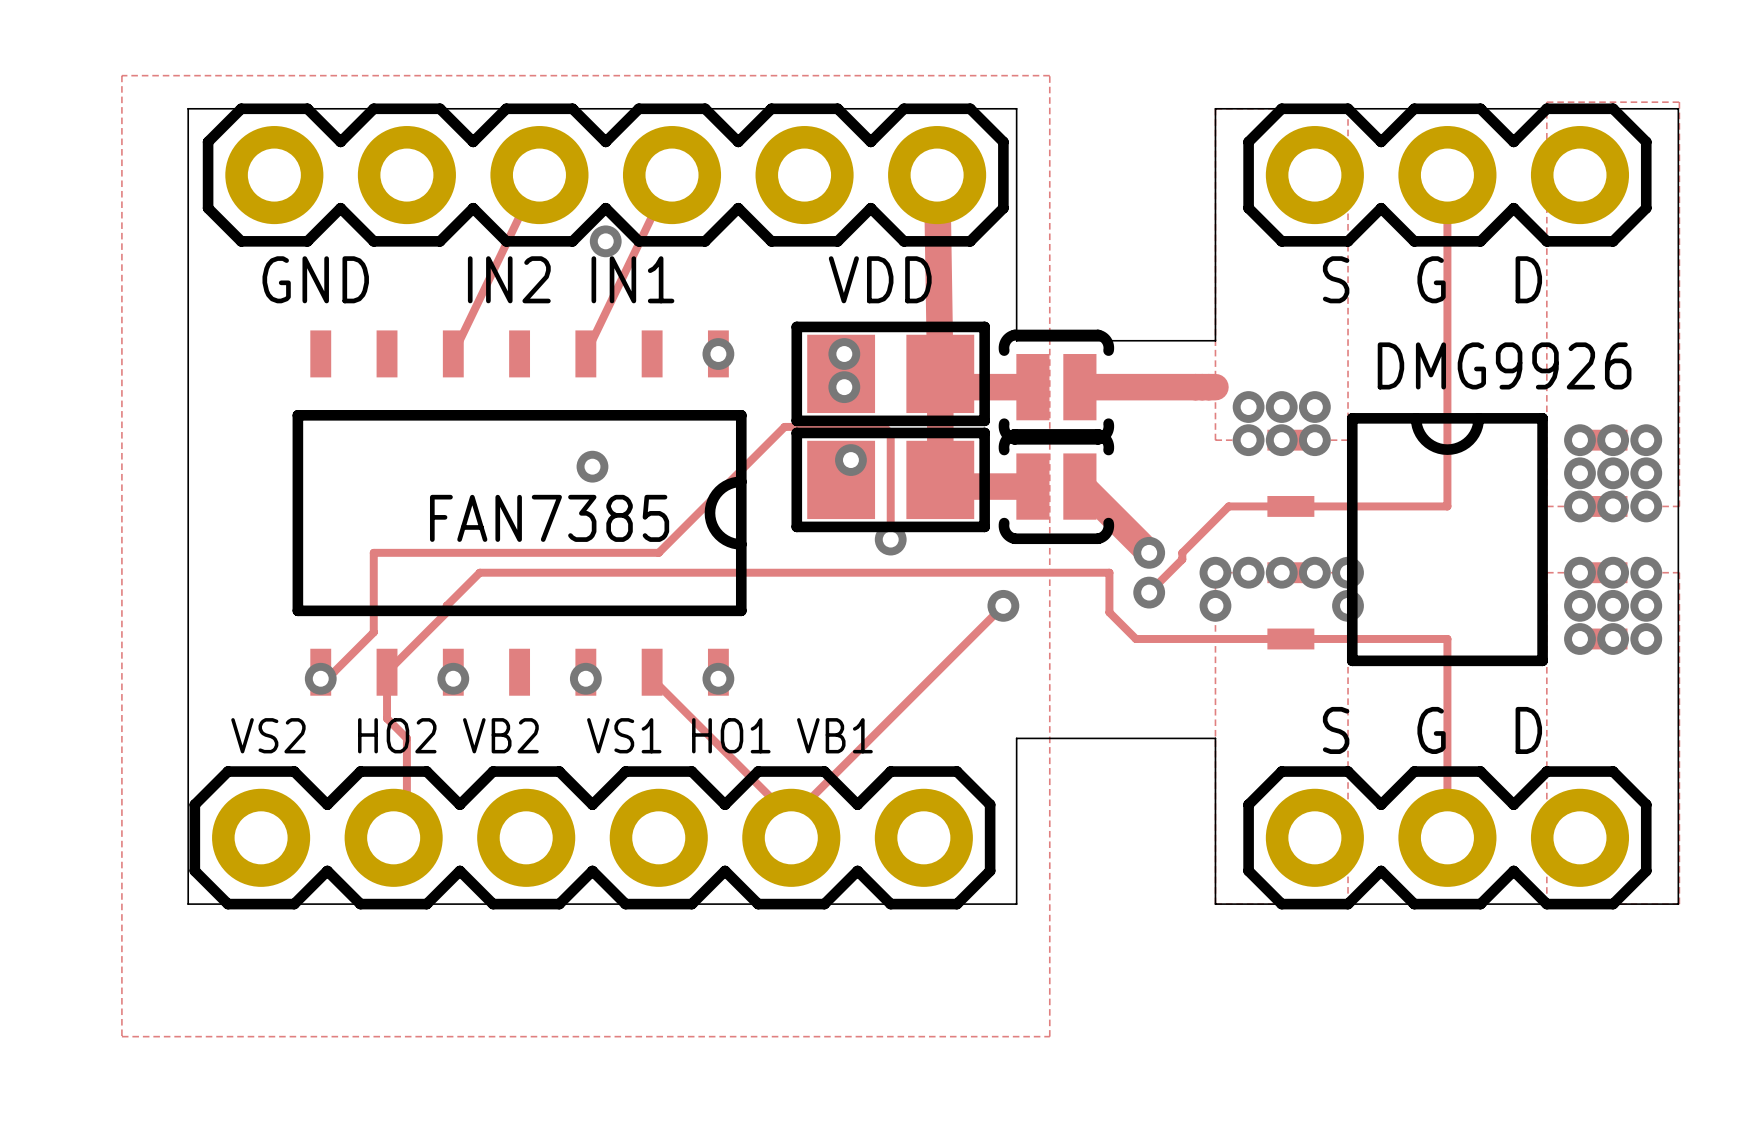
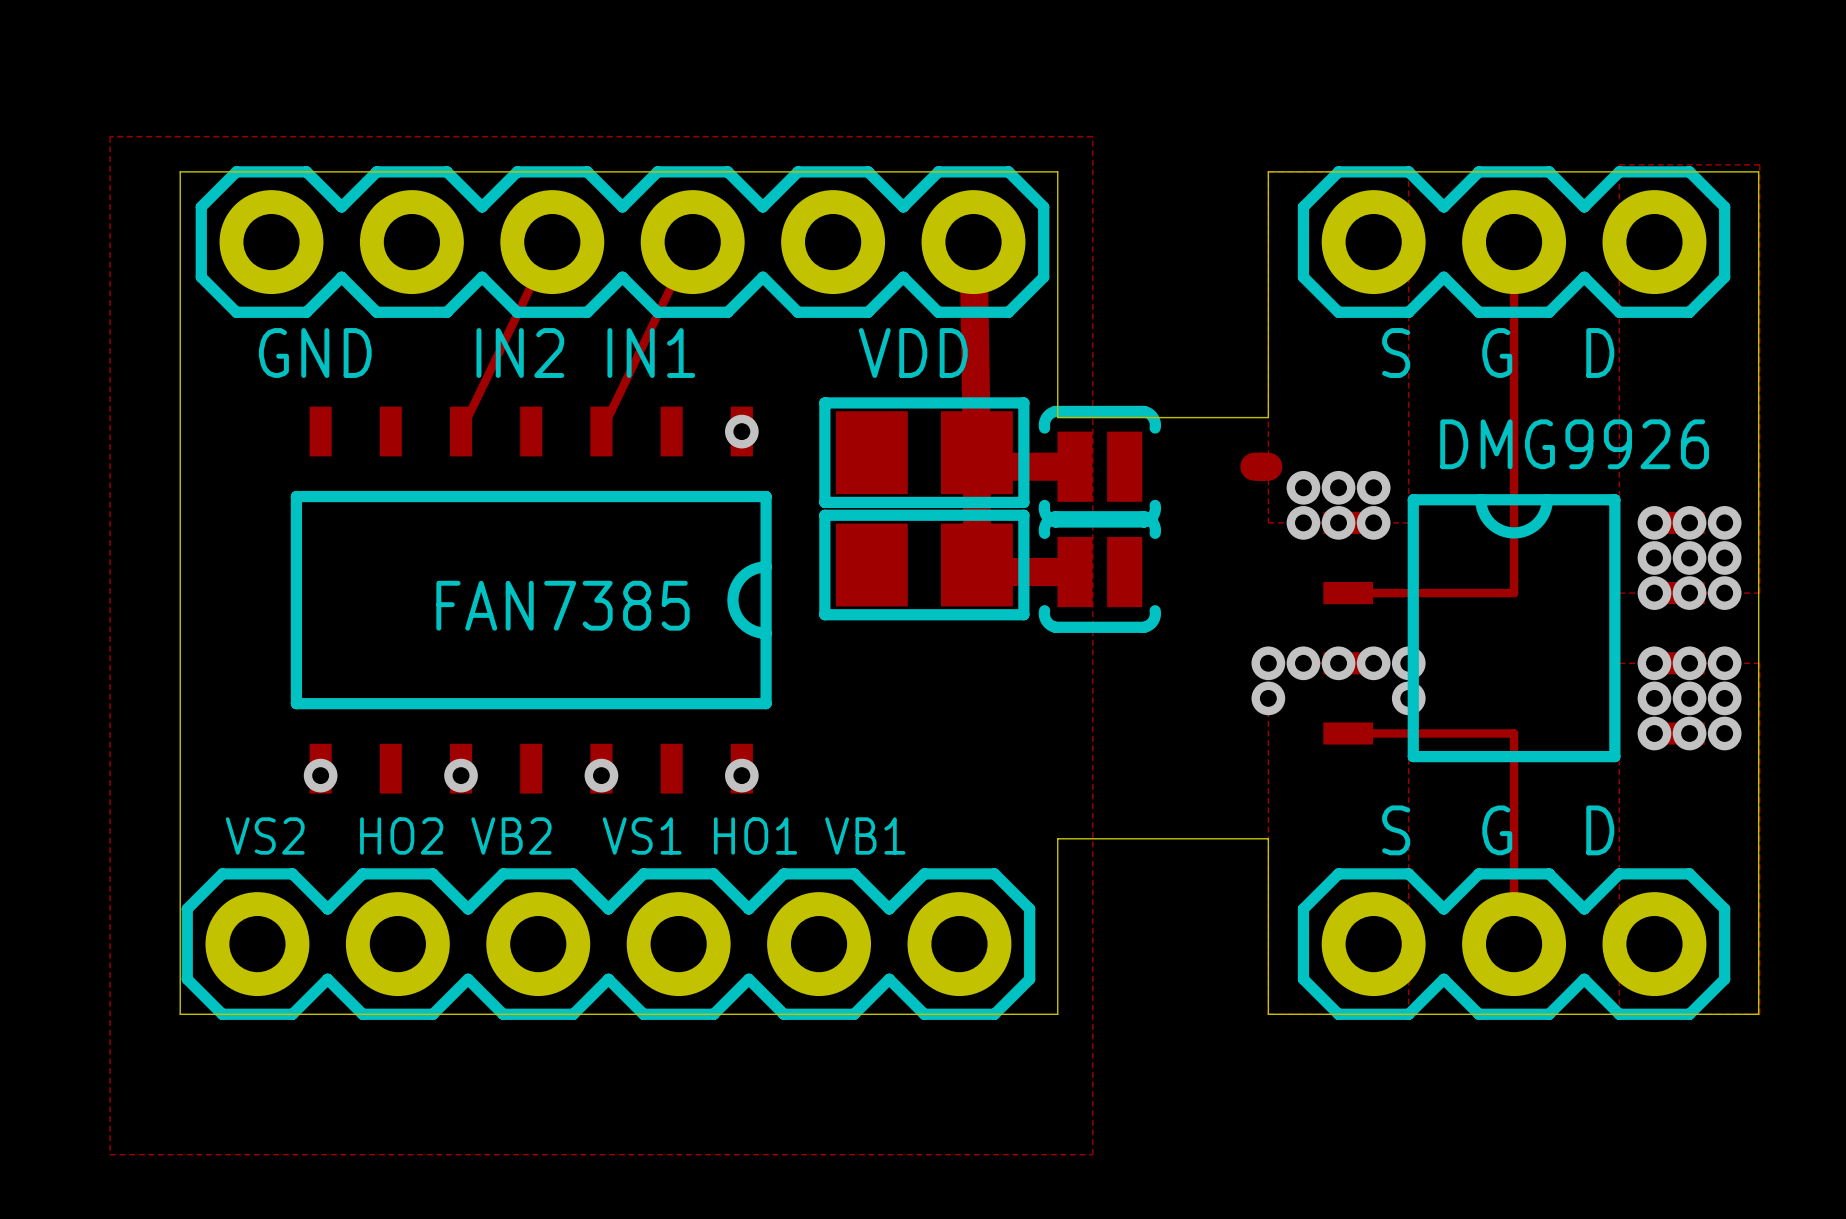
via: (605, 241) -> none
via: (844, 354) -> none
via: (844, 387) -> none
track: (1079, 387) (1202, 387) -> none
via: (850, 460) -> none
via: (592, 466) -> none
track: (1079, 486) (1082, 486) (1149, 552) -> none
track: (1290, 506) (1228, 506) (1182, 552) (1182, 559) (1149, 592) -> none
track: (890, 539) (890, 433) (884, 426) (784, 426) (658, 552) (373, 552) (373, 632) (334, 672) (320, 672) (320, 678) -> none
via: (890, 539) -> none
via: (1149, 552) -> none
via: (1149, 592) -> none
track: (1003, 605) (791, 817) -> none
via: (1003, 605) -> none
track: (1290, 638) (1135, 638) (1109, 612) (1109, 572) (479, 572) (446, 605) (446, 612) (387, 672) (387, 718) (406, 738) (406, 824) (393, 837) -> none
track: (652, 672) (652, 678) (791, 817) -> none

